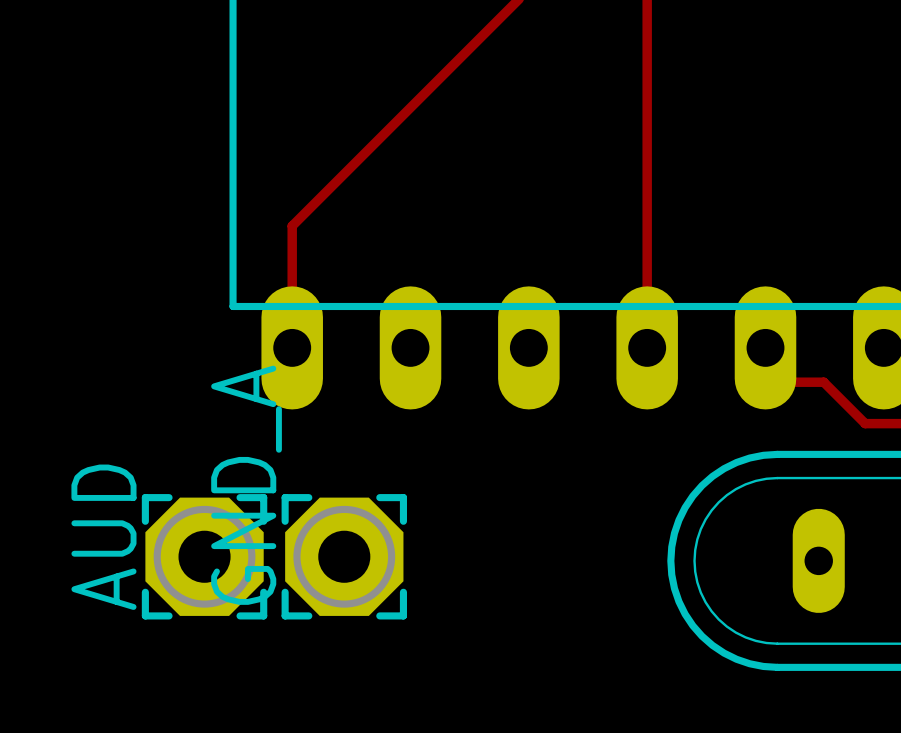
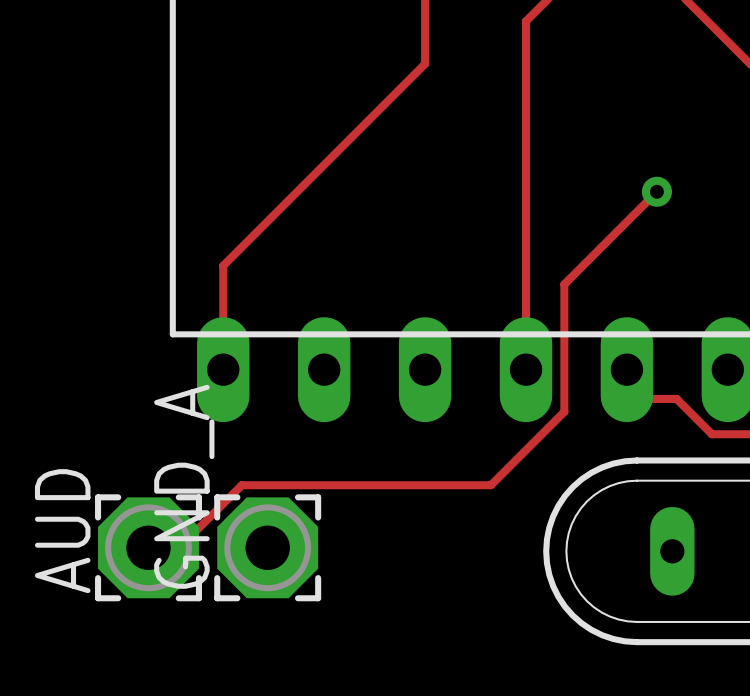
track: none -> (656, 191) (564, 284) (564, 411) (490, 485) (241, 485) (179, 547) (148, 547)
via: none -> (656, 191)

